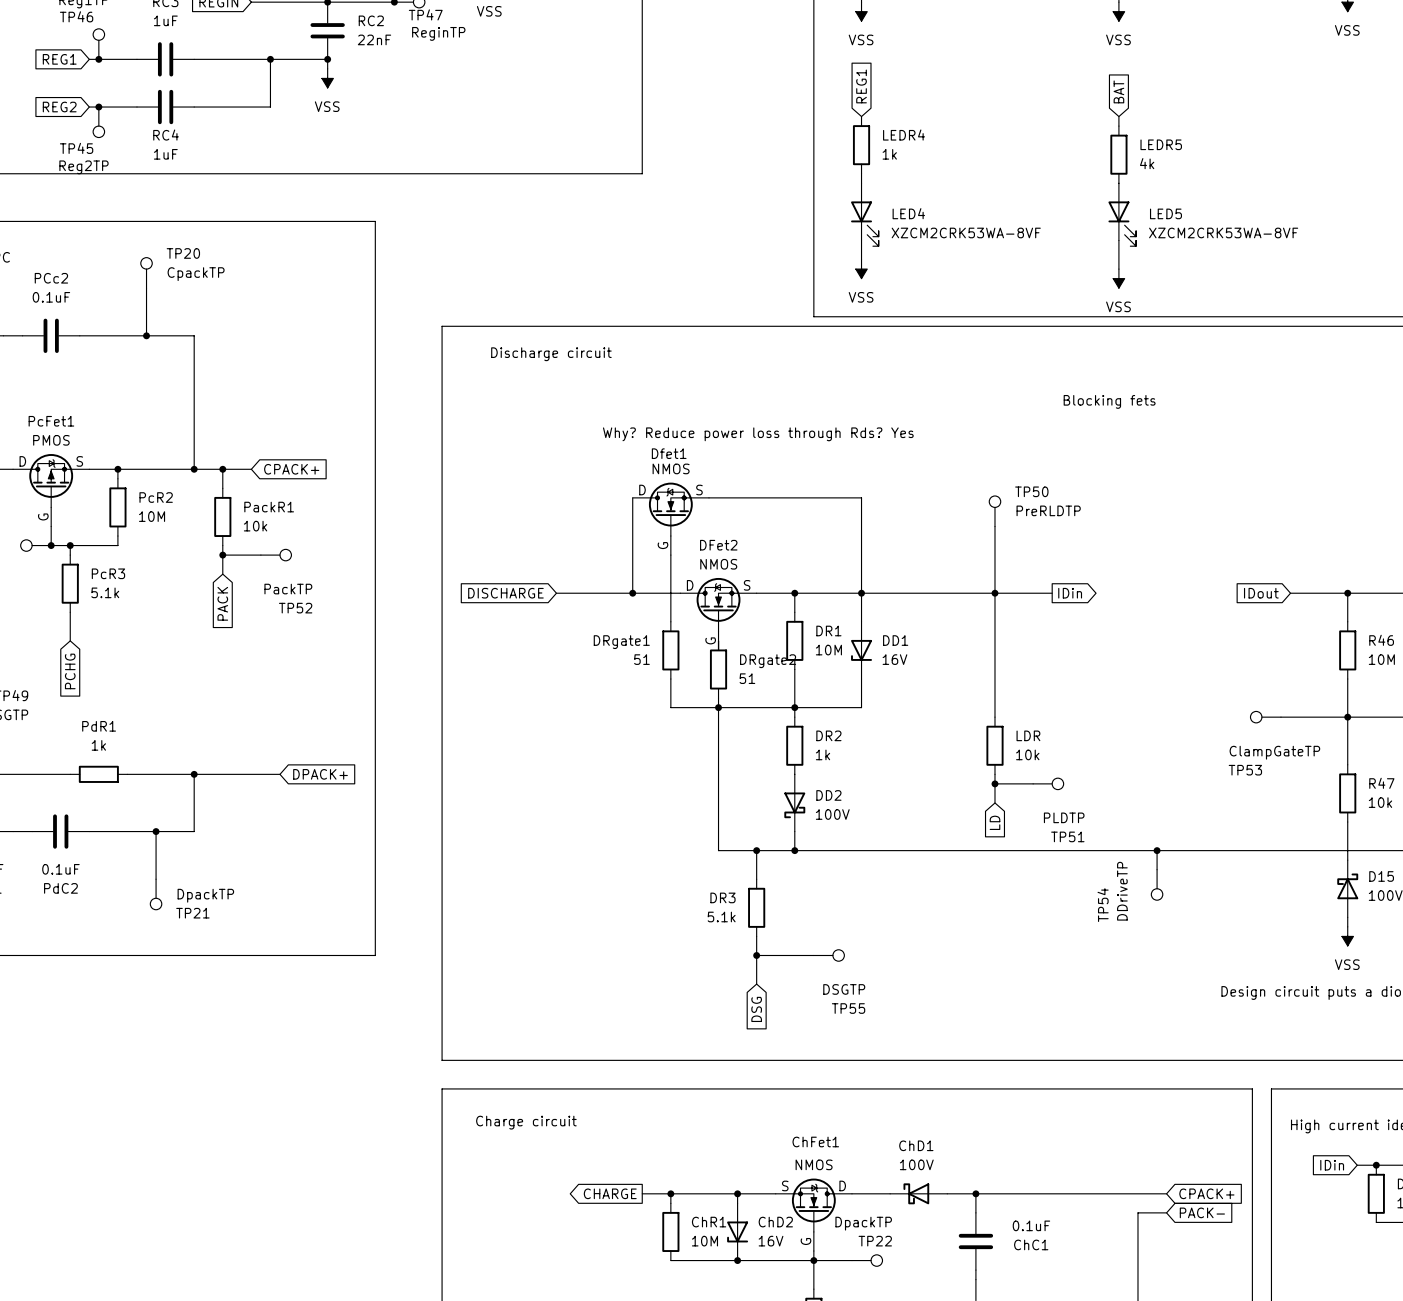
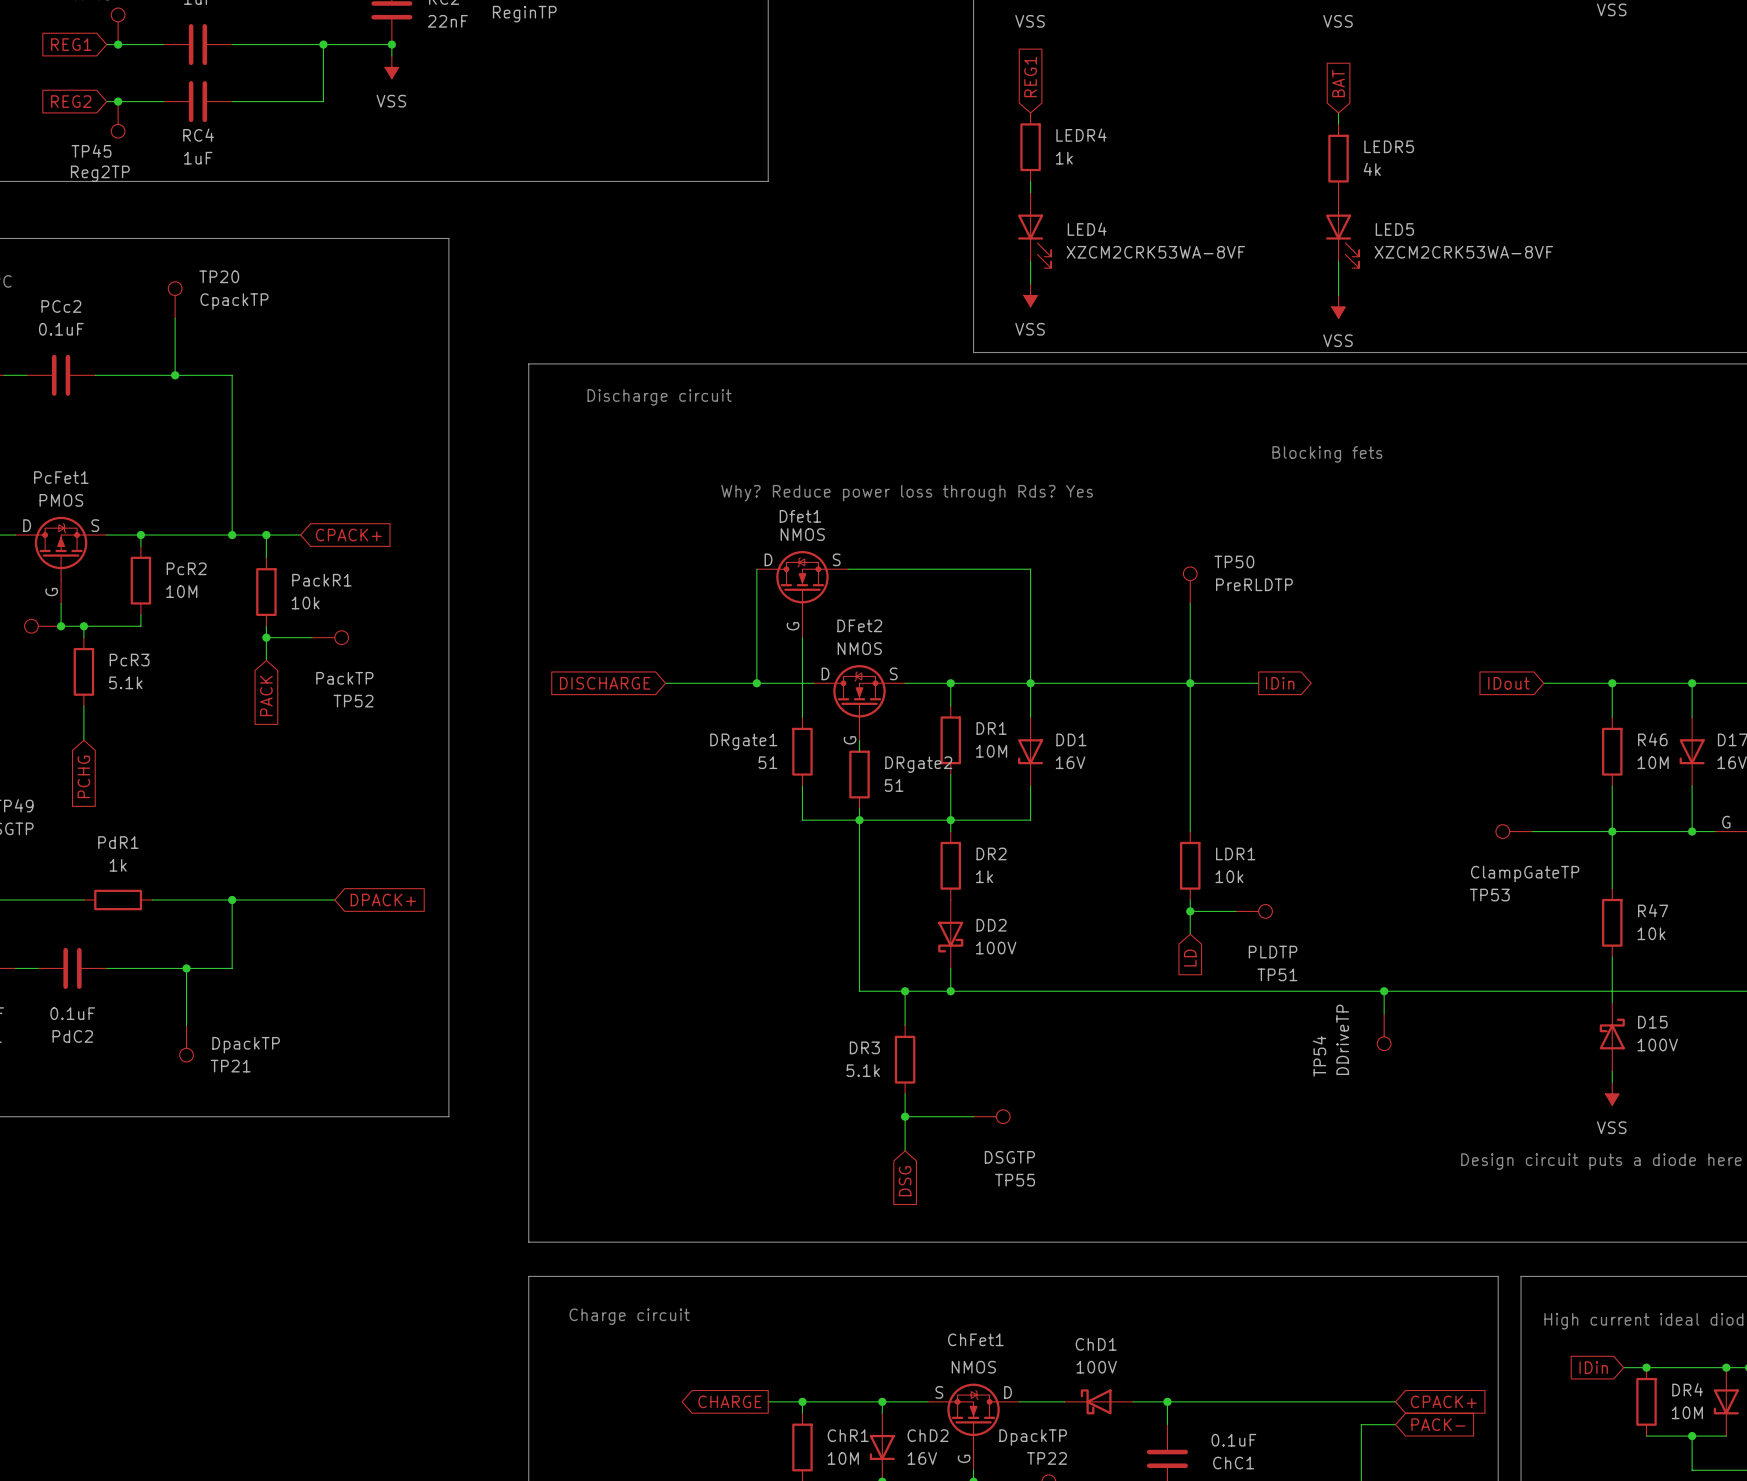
LDR name: LDR (1028, 735) -> LDR1 (1235, 853)

